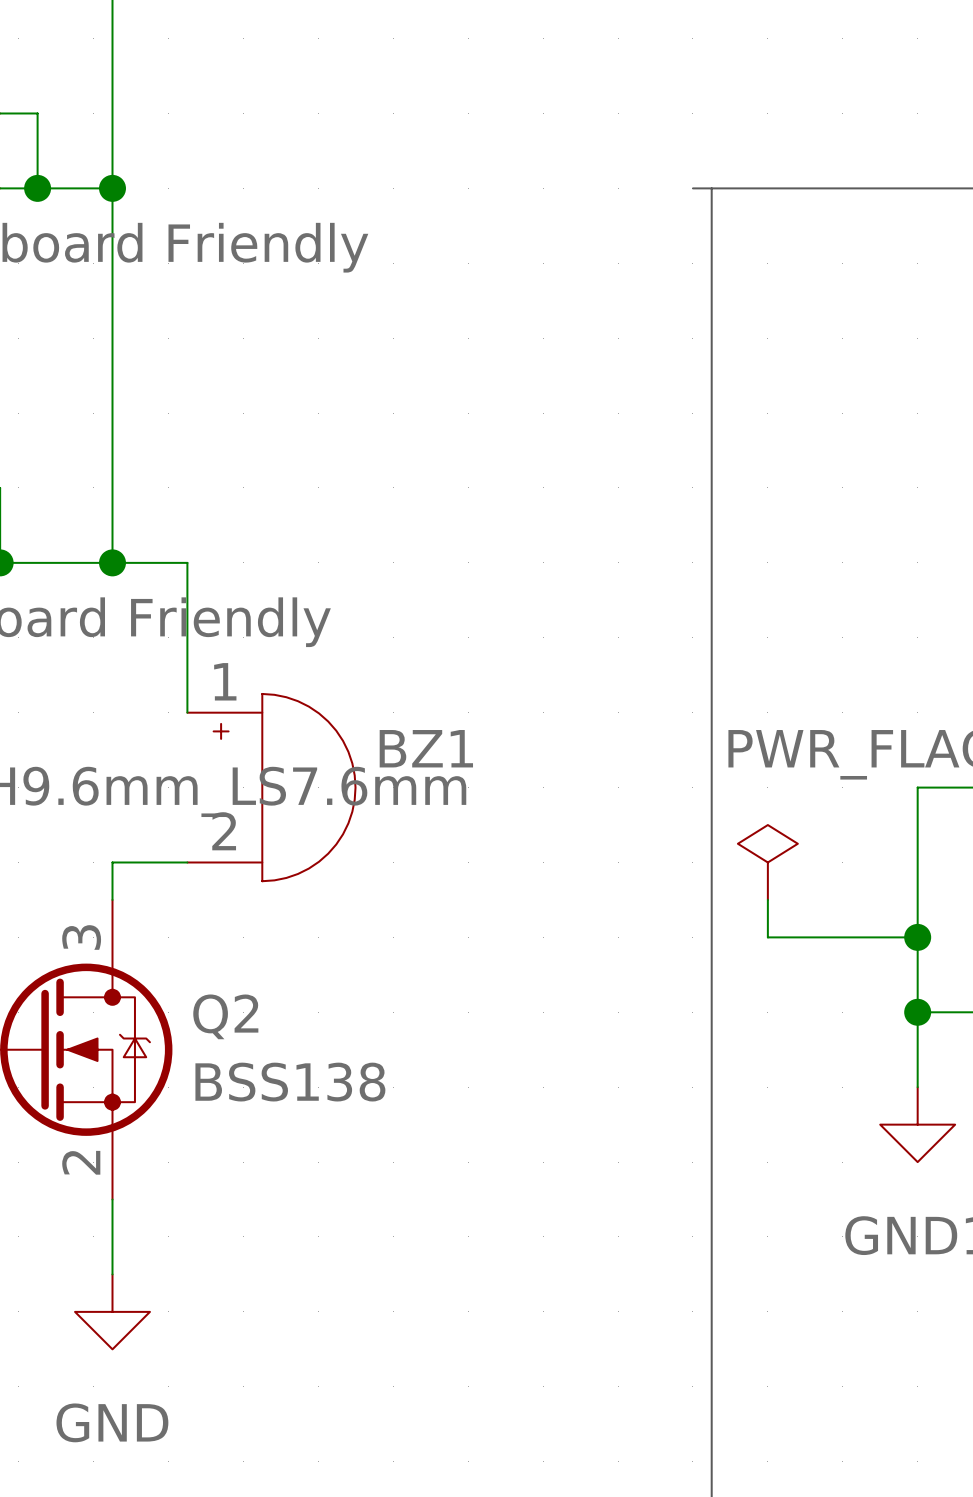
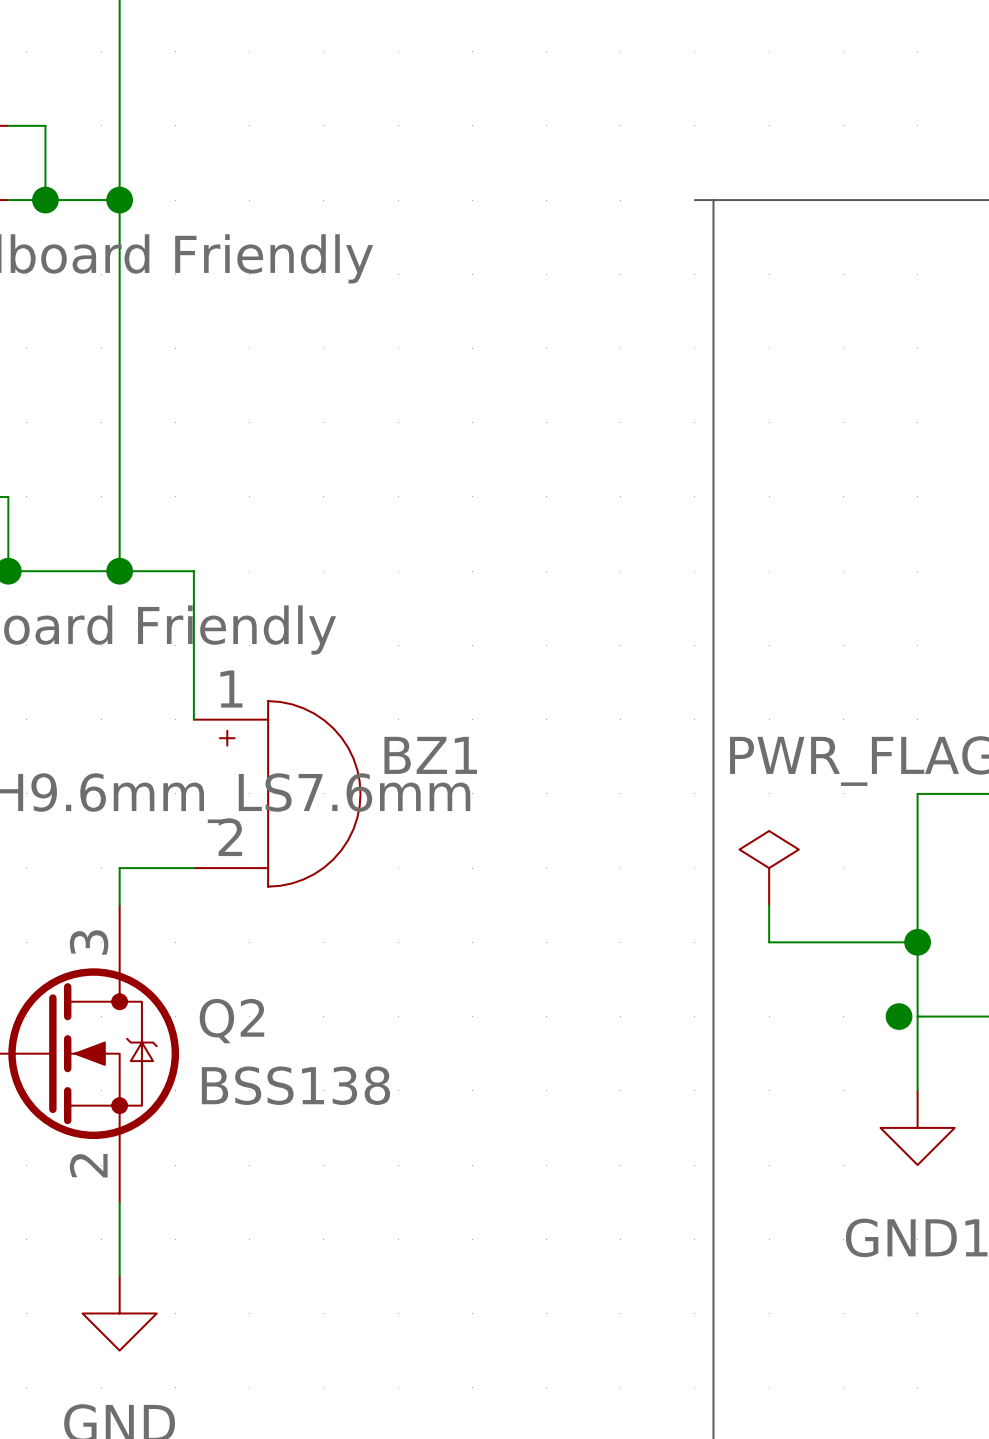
junction position: (917, 1012) -> (899, 1016)

